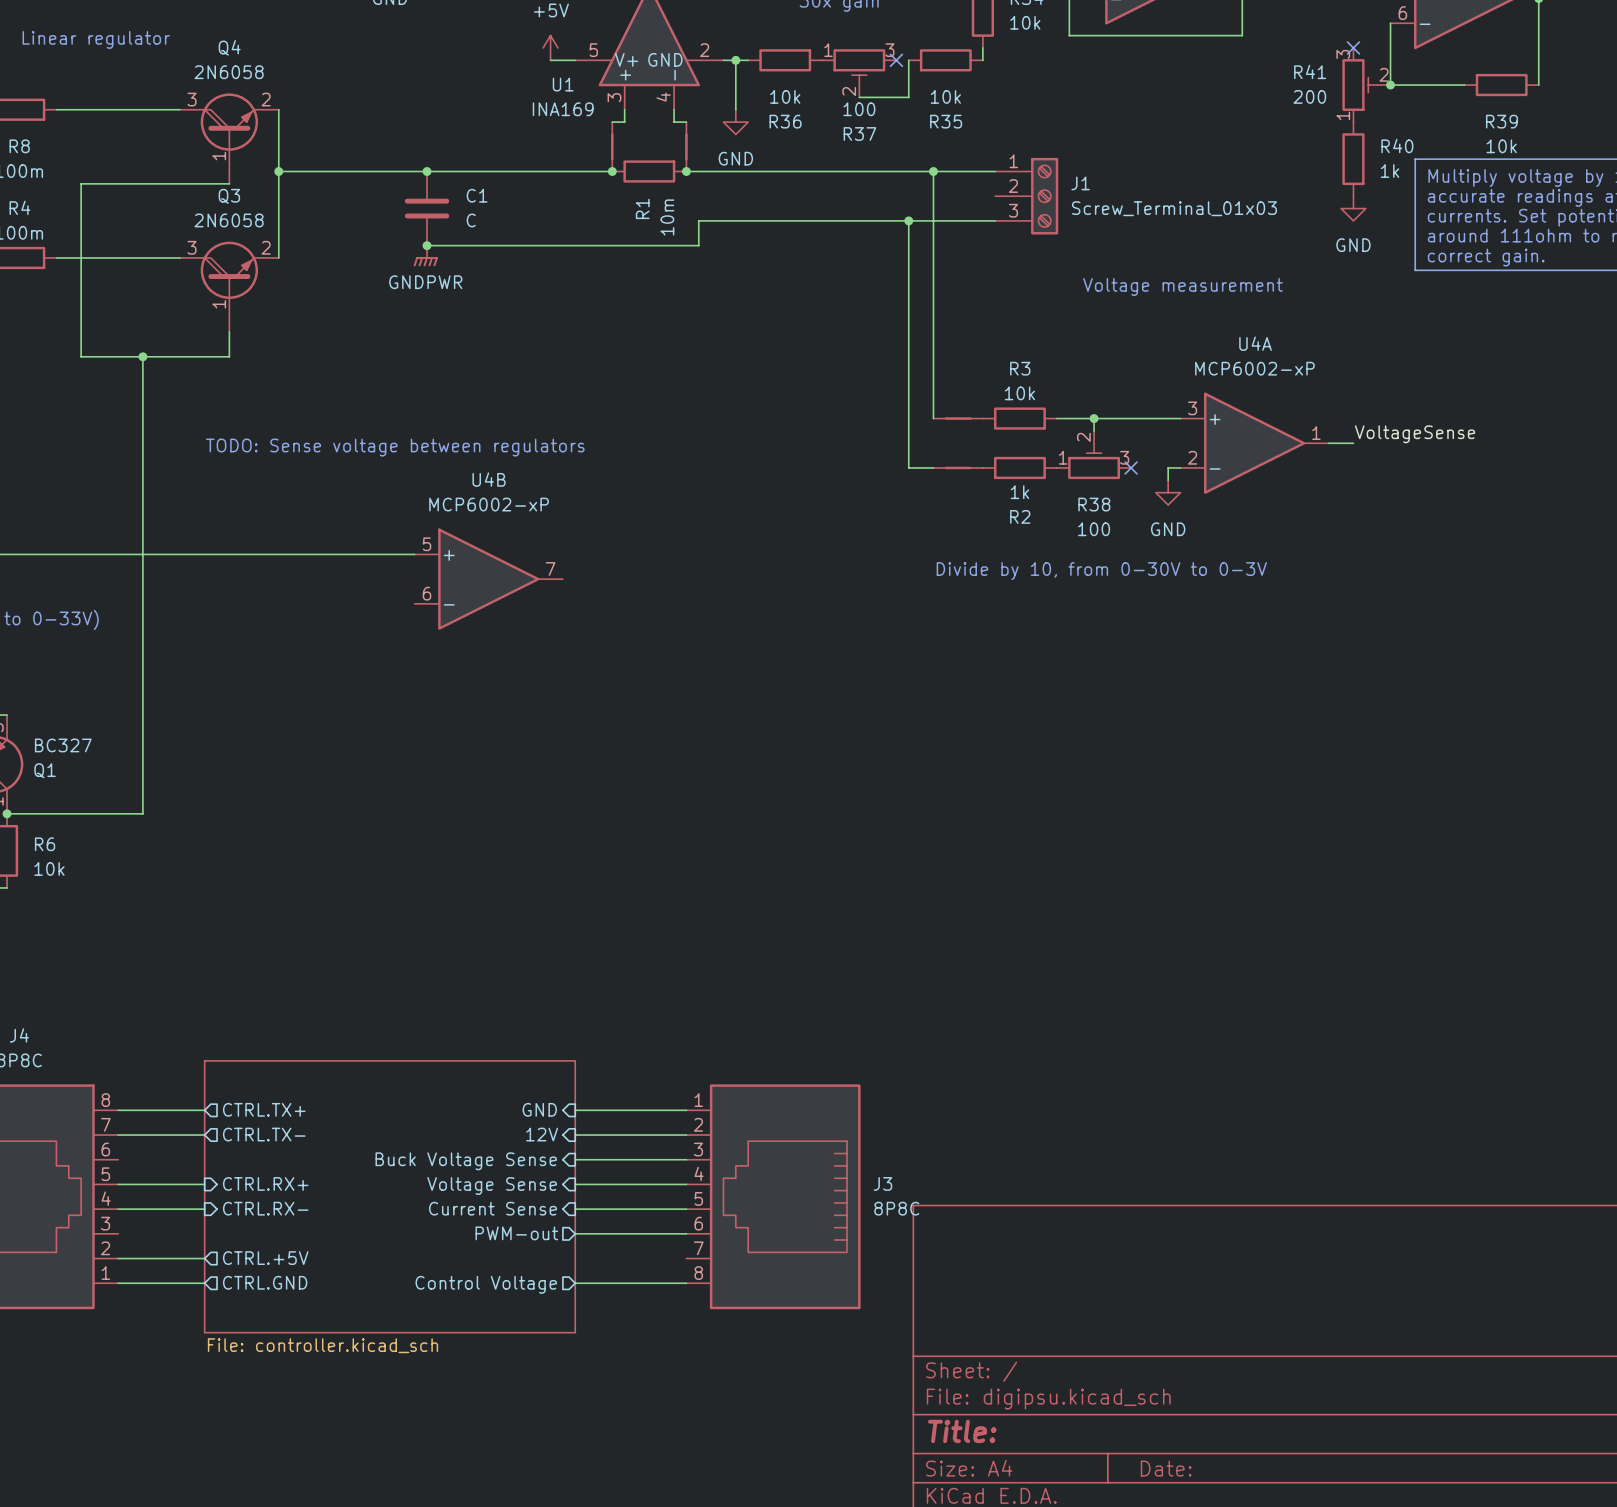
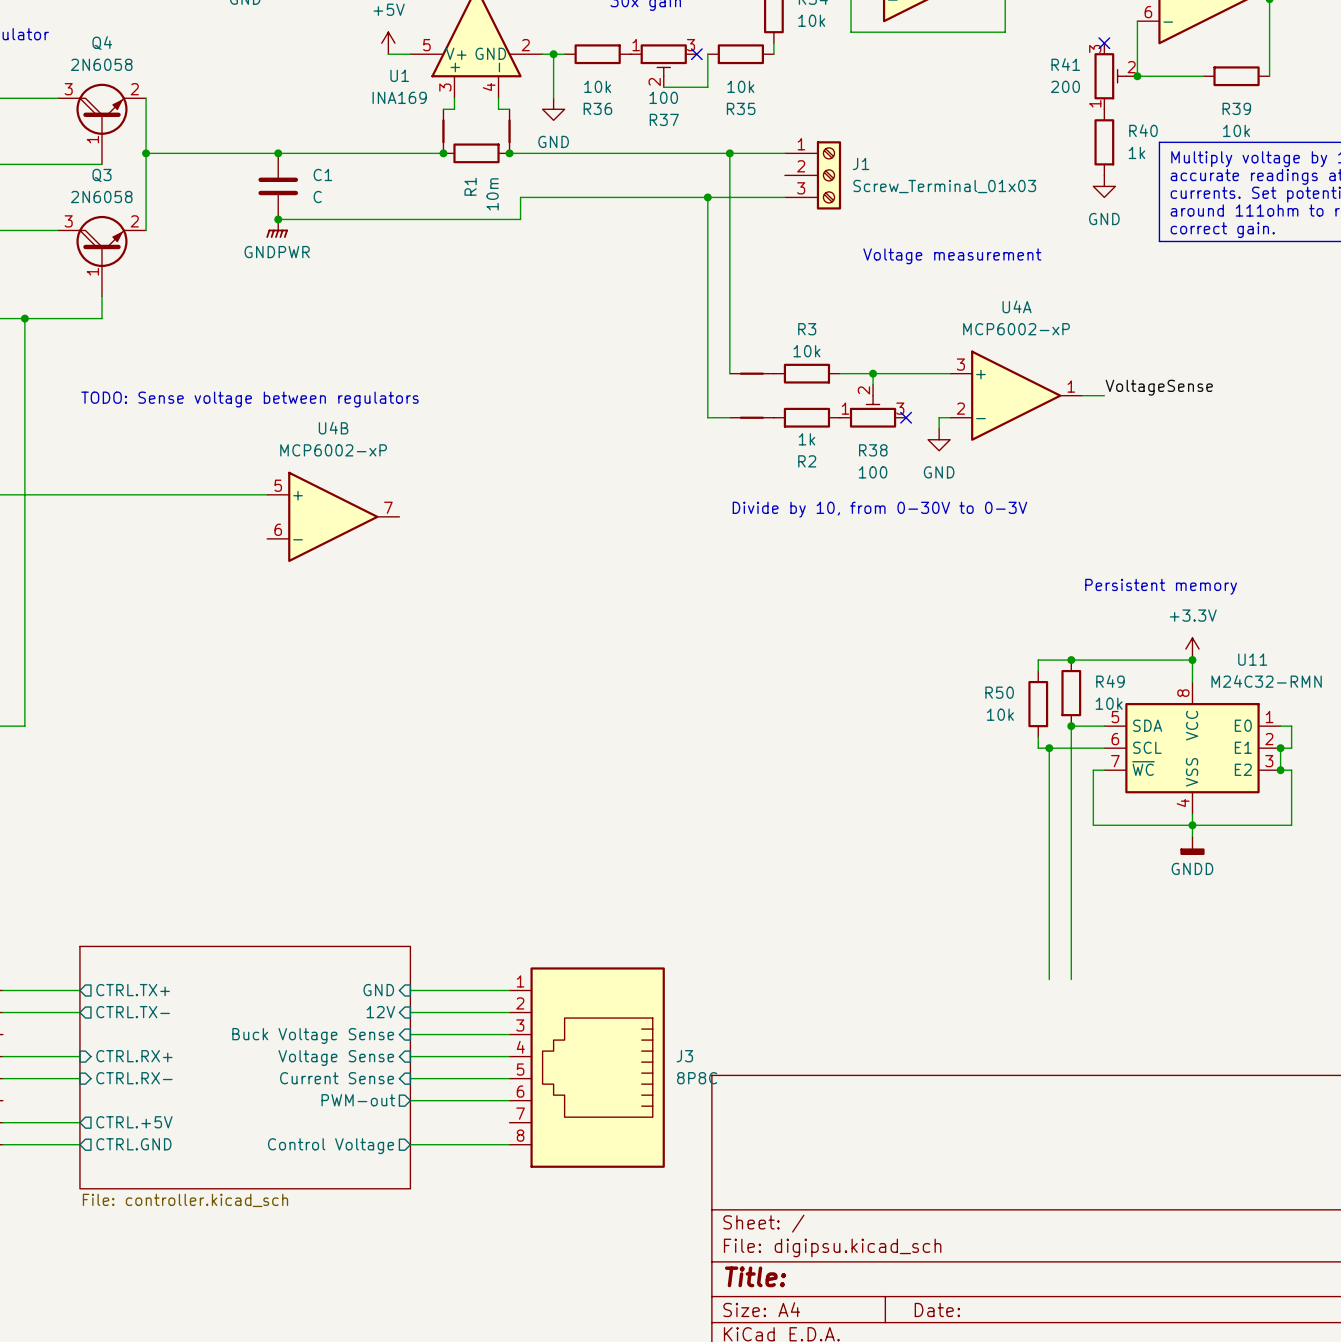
text: none -> Persistent memory (1161, 586)
power symbol: none -> +3.3V (1192, 649)
junction: none -> (1071, 660)
junction: none -> (1192, 660)
wire: none -> (1038, 671) (1038, 660) (1192, 660) (1192, 682)
R49: none -> 10k (1071, 693)
R50: none -> 10k (1038, 704)
junction: none -> (1071, 726)
wire: none -> (1104, 726) (1071, 726) (1071, 979)
wire: none -> (1280, 726) (1291, 726) (1291, 748) (1280, 748) (1280, 770) (1291, 770) (1291, 825) (1093, 825) (1093, 770) (1104, 770)
wire: none -> (1038, 737) (1038, 748) (1104, 748)
wire: none -> (1049, 748) (1049, 979)
junction: none -> (1049, 748)
U11: none -> M24C32-RMN (1192, 748)
junction: none -> (1280, 748)
junction: none -> (1280, 770)
wire: none -> (1192, 814) (1192, 836)
junction: none -> (1192, 825)
power symbol: none -> GNDD (1192, 845)

